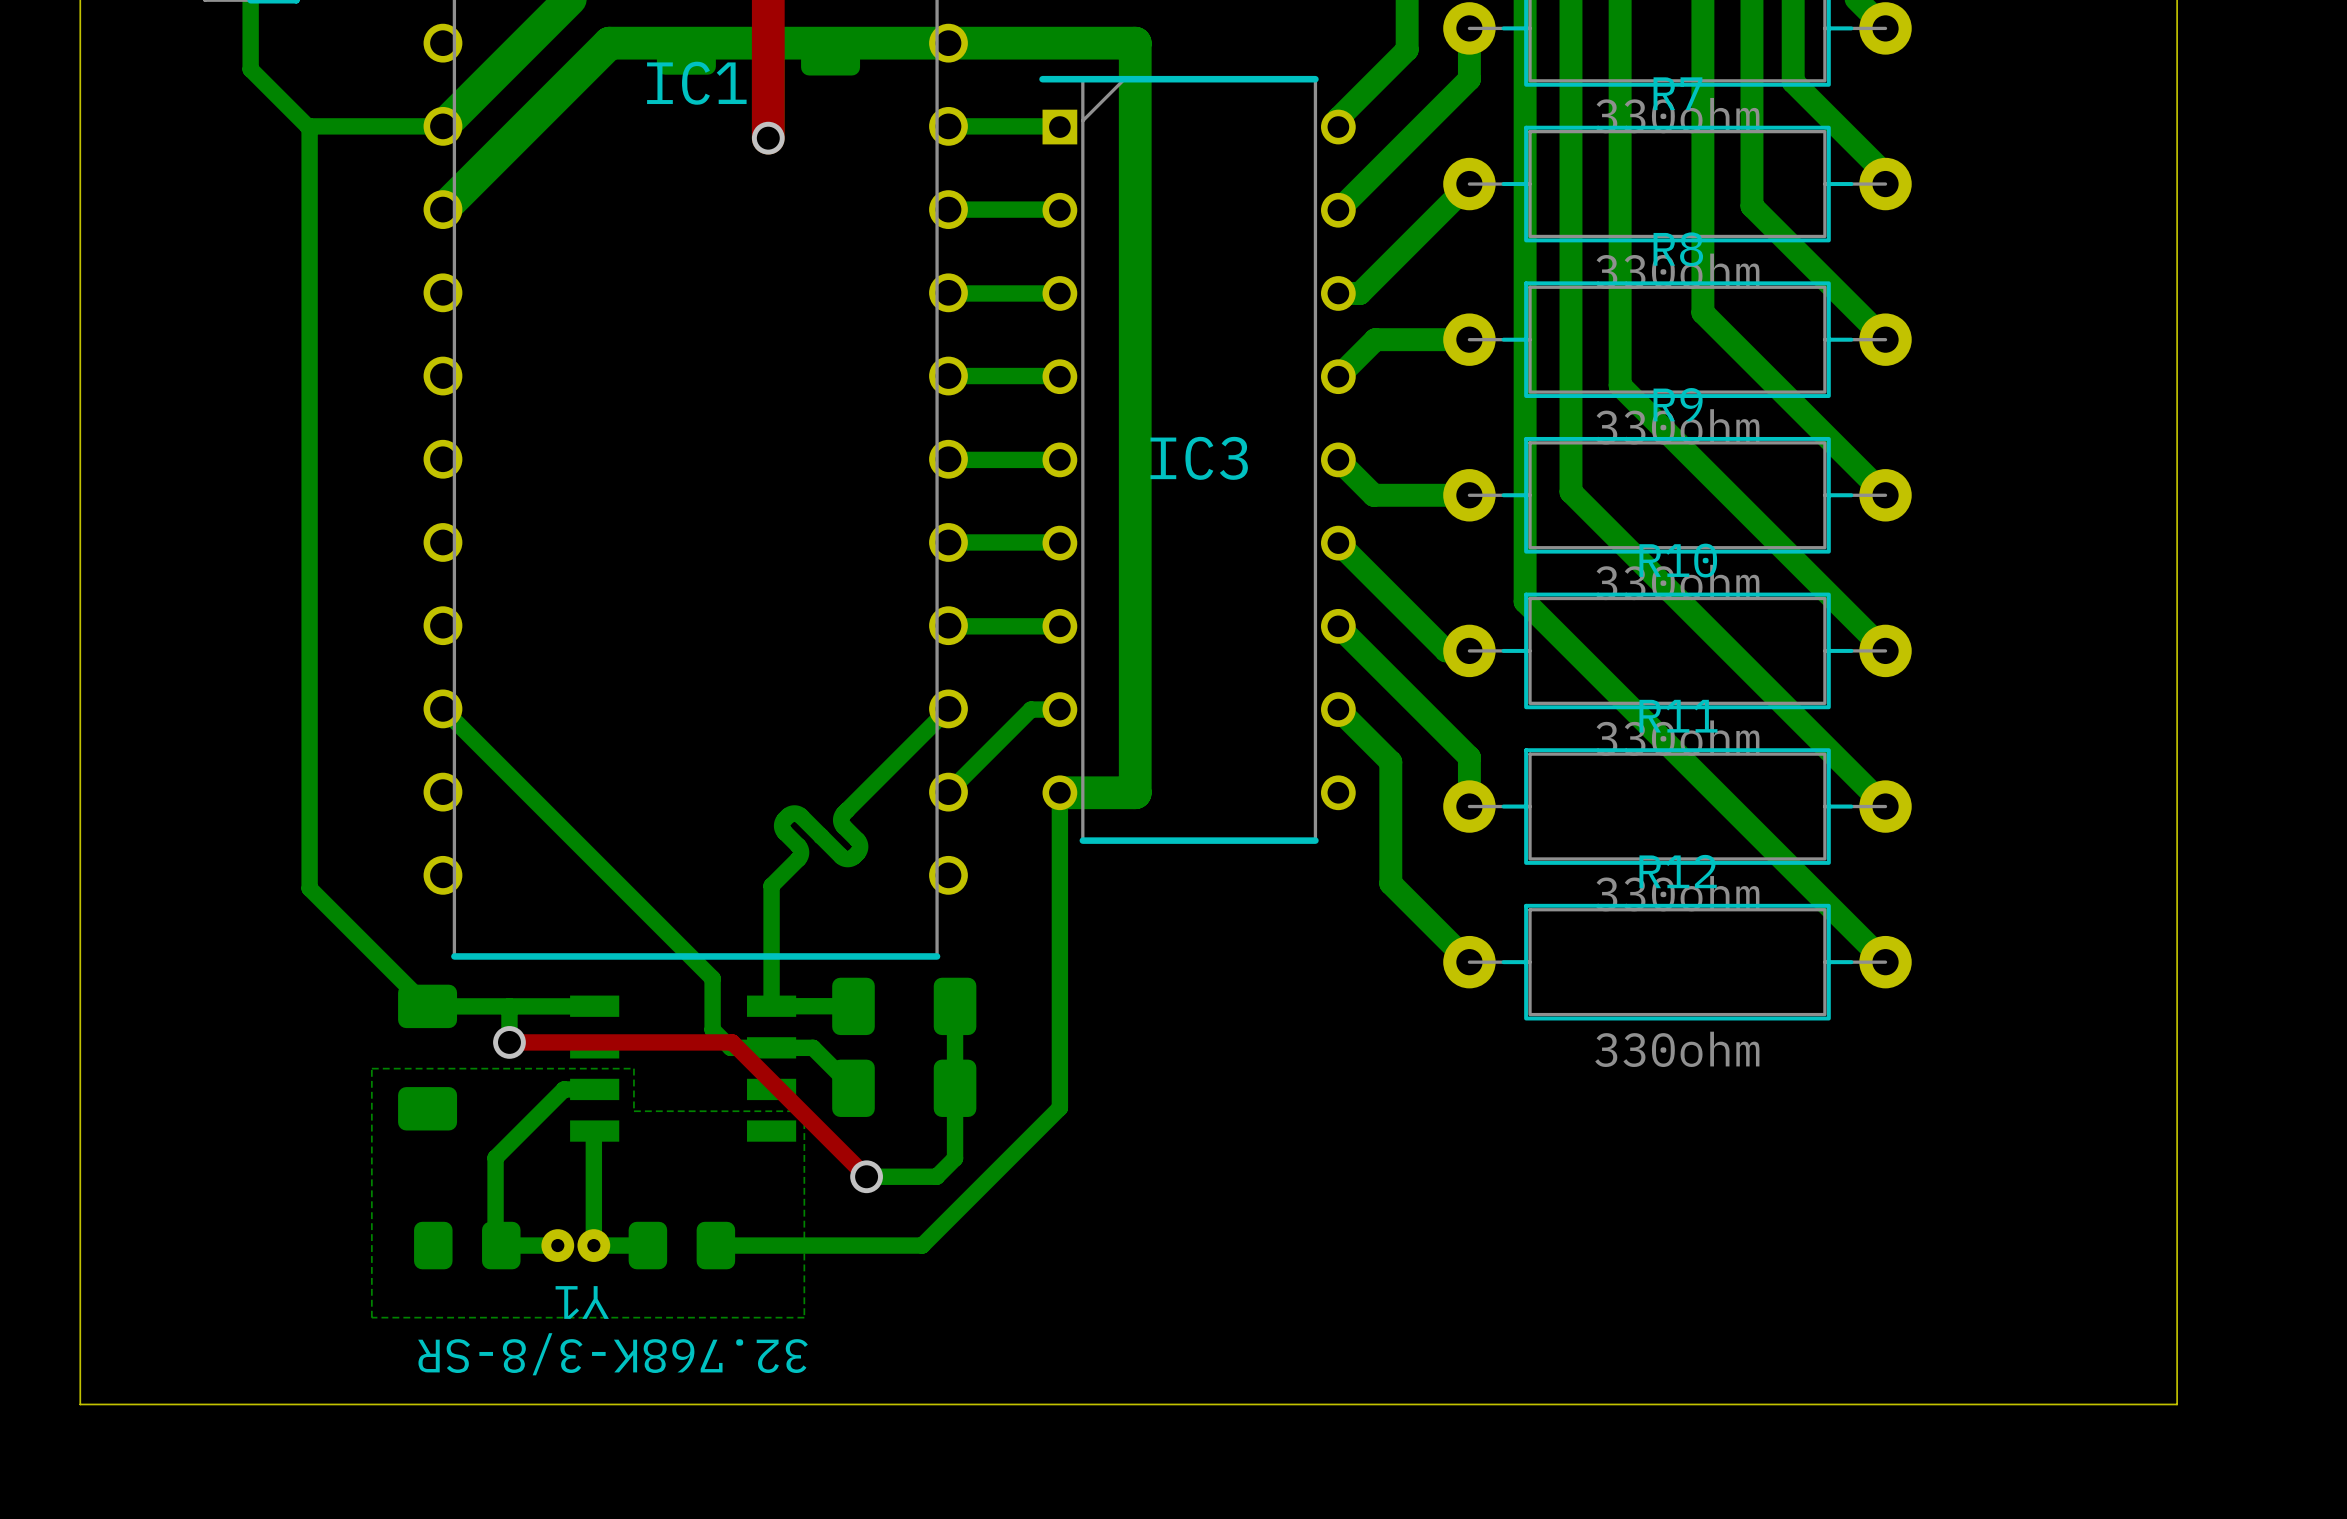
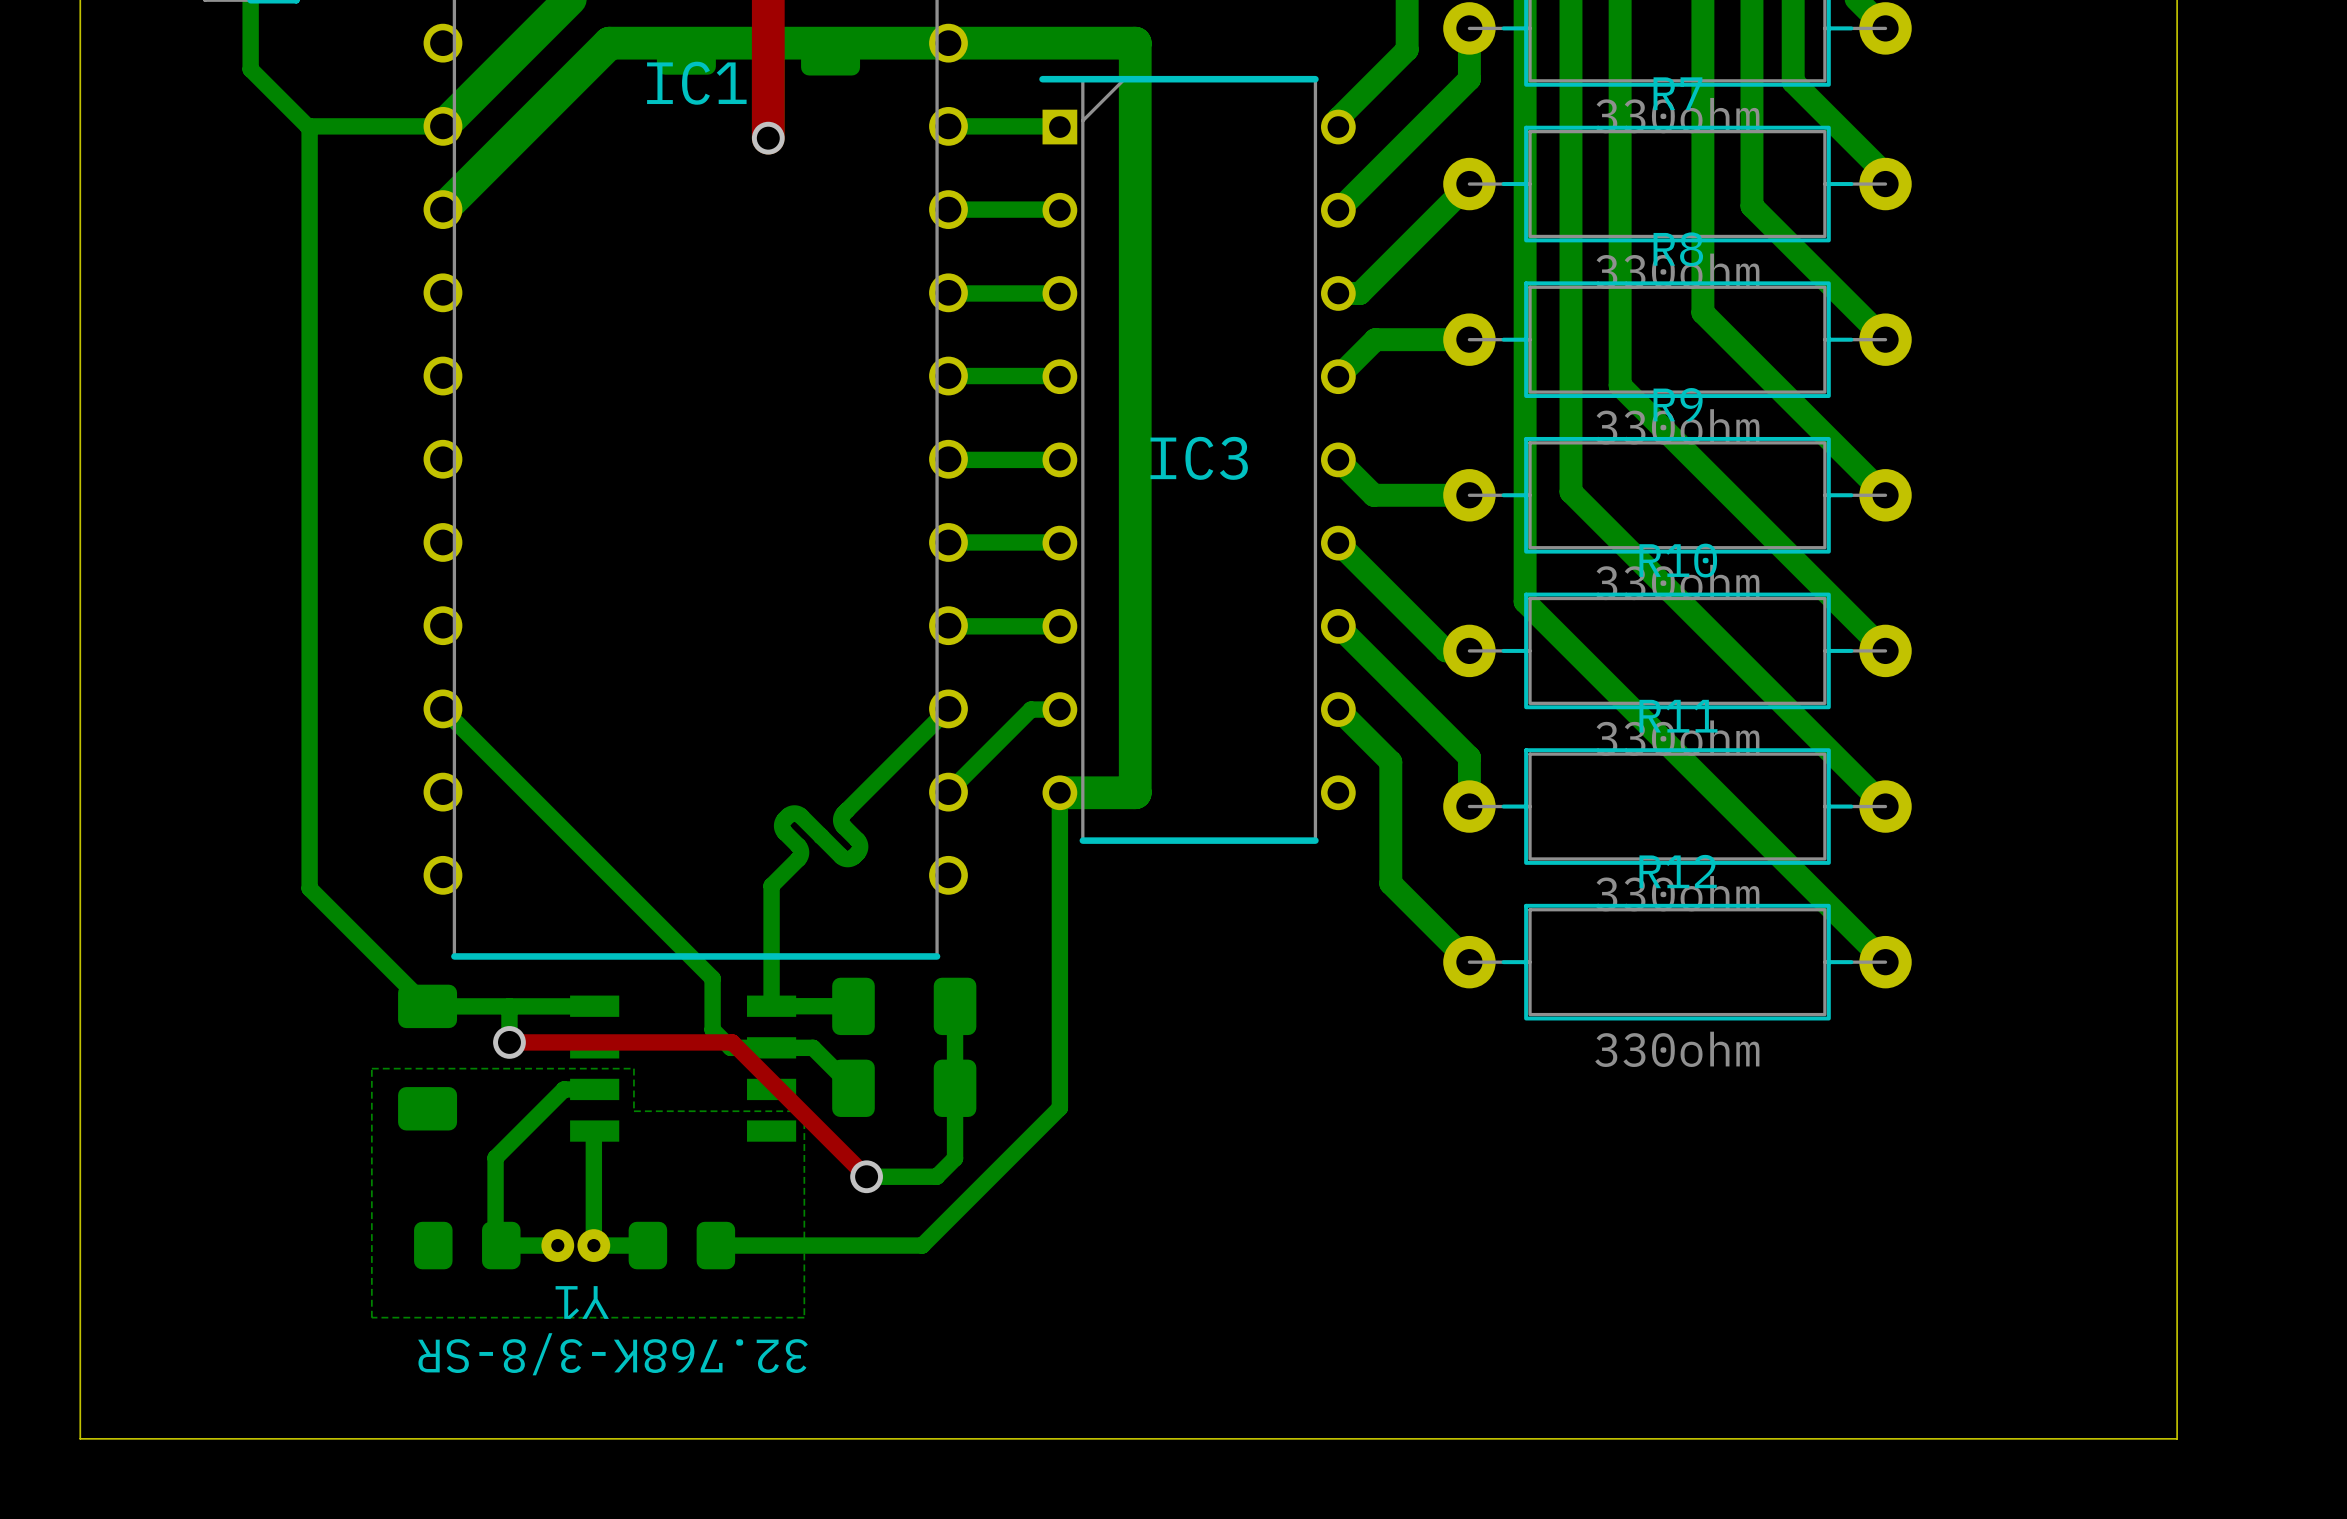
board edge: (80, 1404) (2177, 1404) -> (80, 1404) (80, 1438) (2177, 1438) (2177, 1404)

